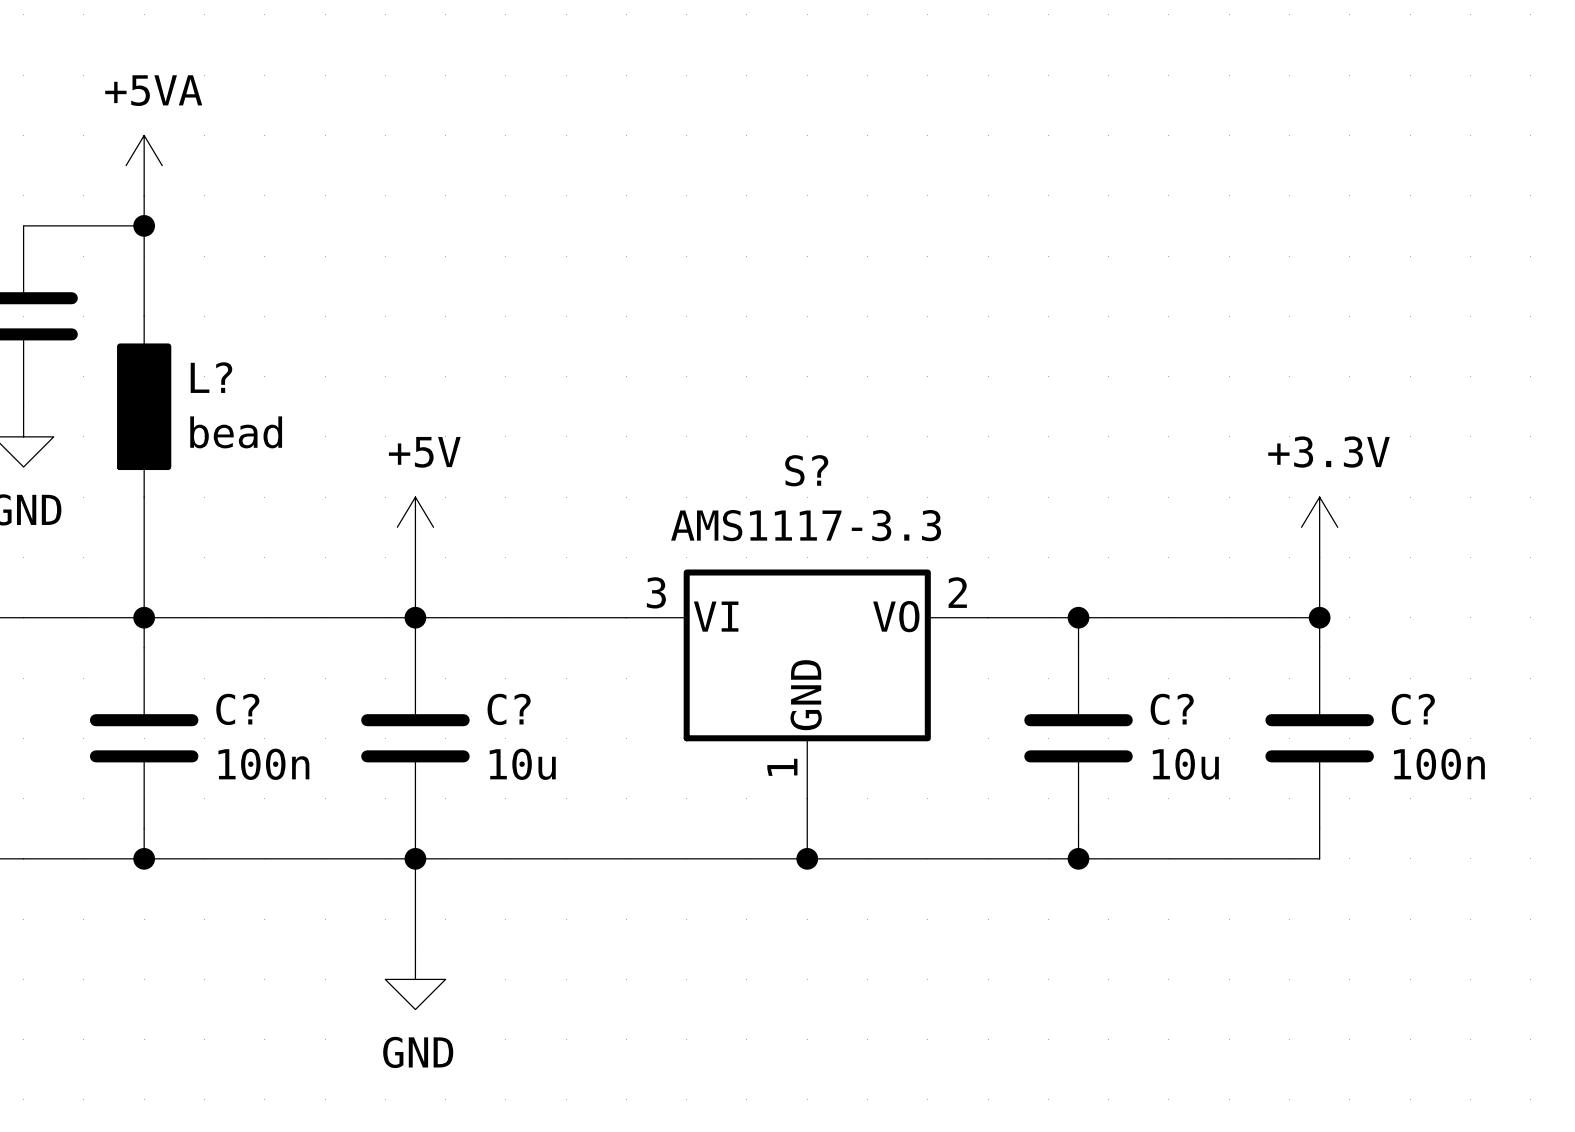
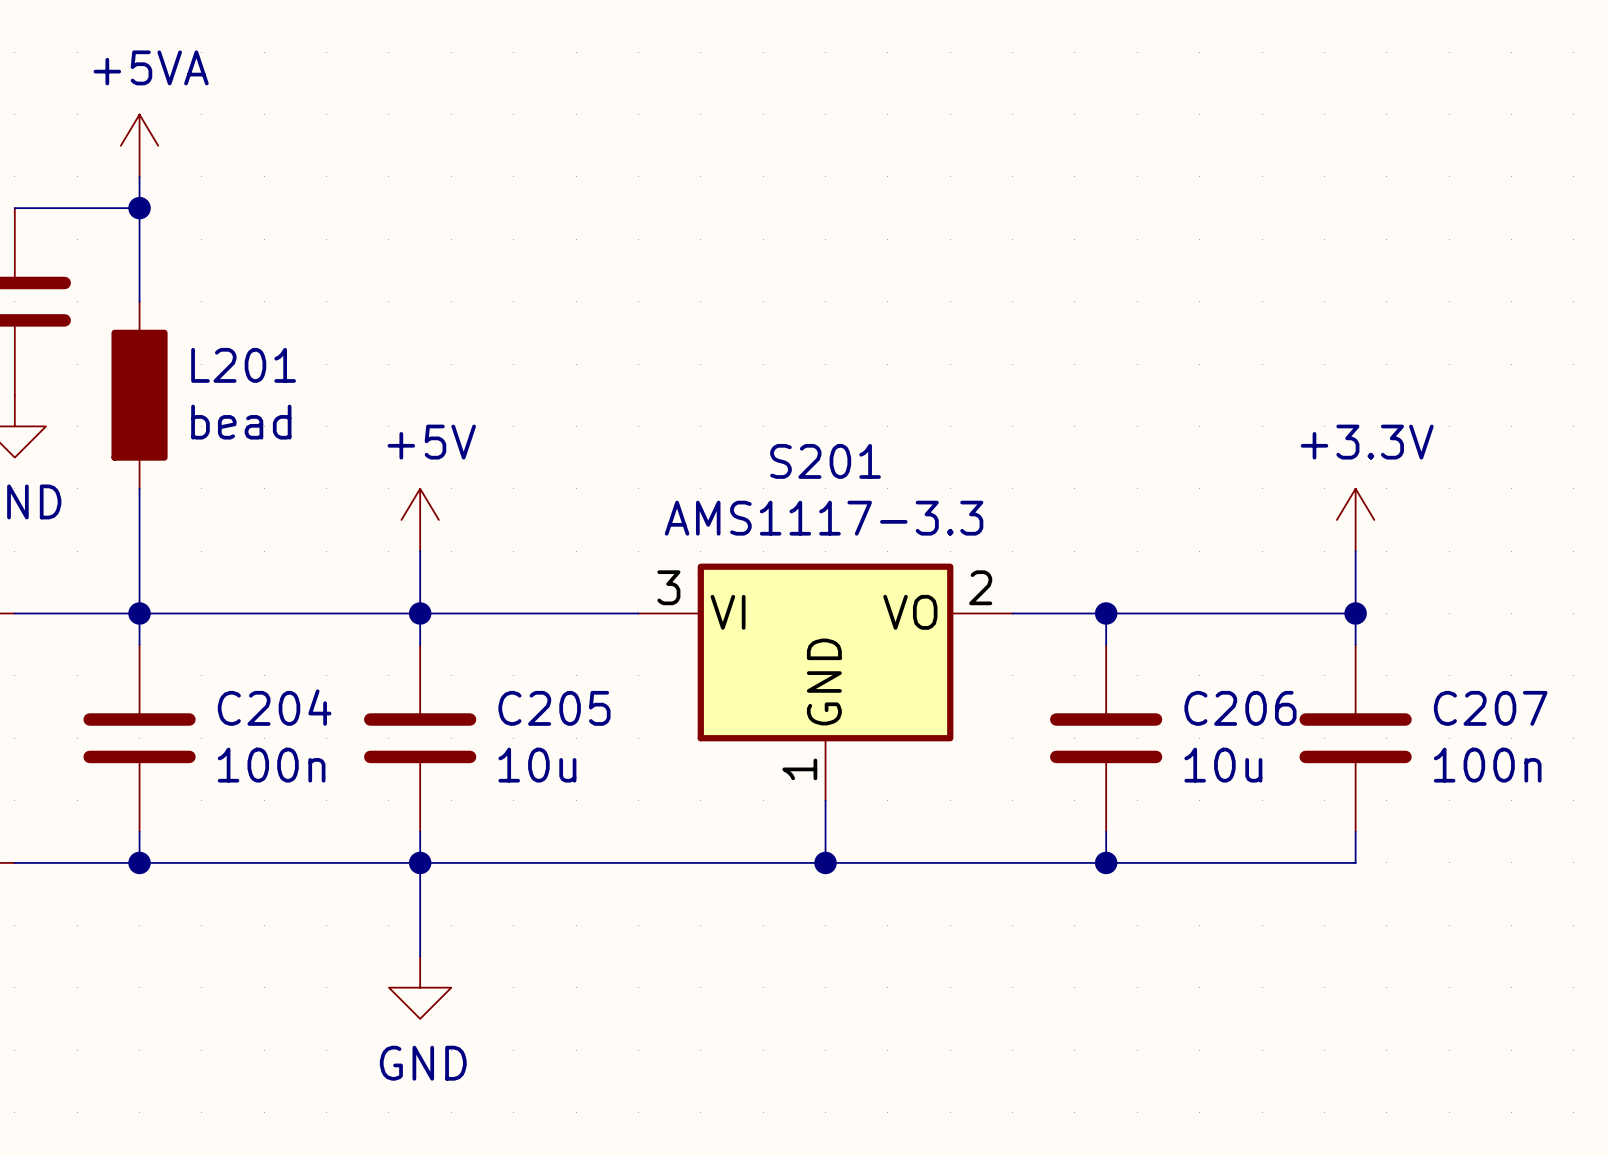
L? name: L? (211, 377) -> L201 (243, 365)
S? name: S? (806, 470) -> S201 (825, 461)
C? name: C? (237, 709) -> C204 (274, 707)
C? name: C? (509, 709) -> C205 (554, 708)
C? name: C? (1172, 709) -> C206 (1240, 708)
C? name: C? (1413, 709) -> C207 (1490, 708)

